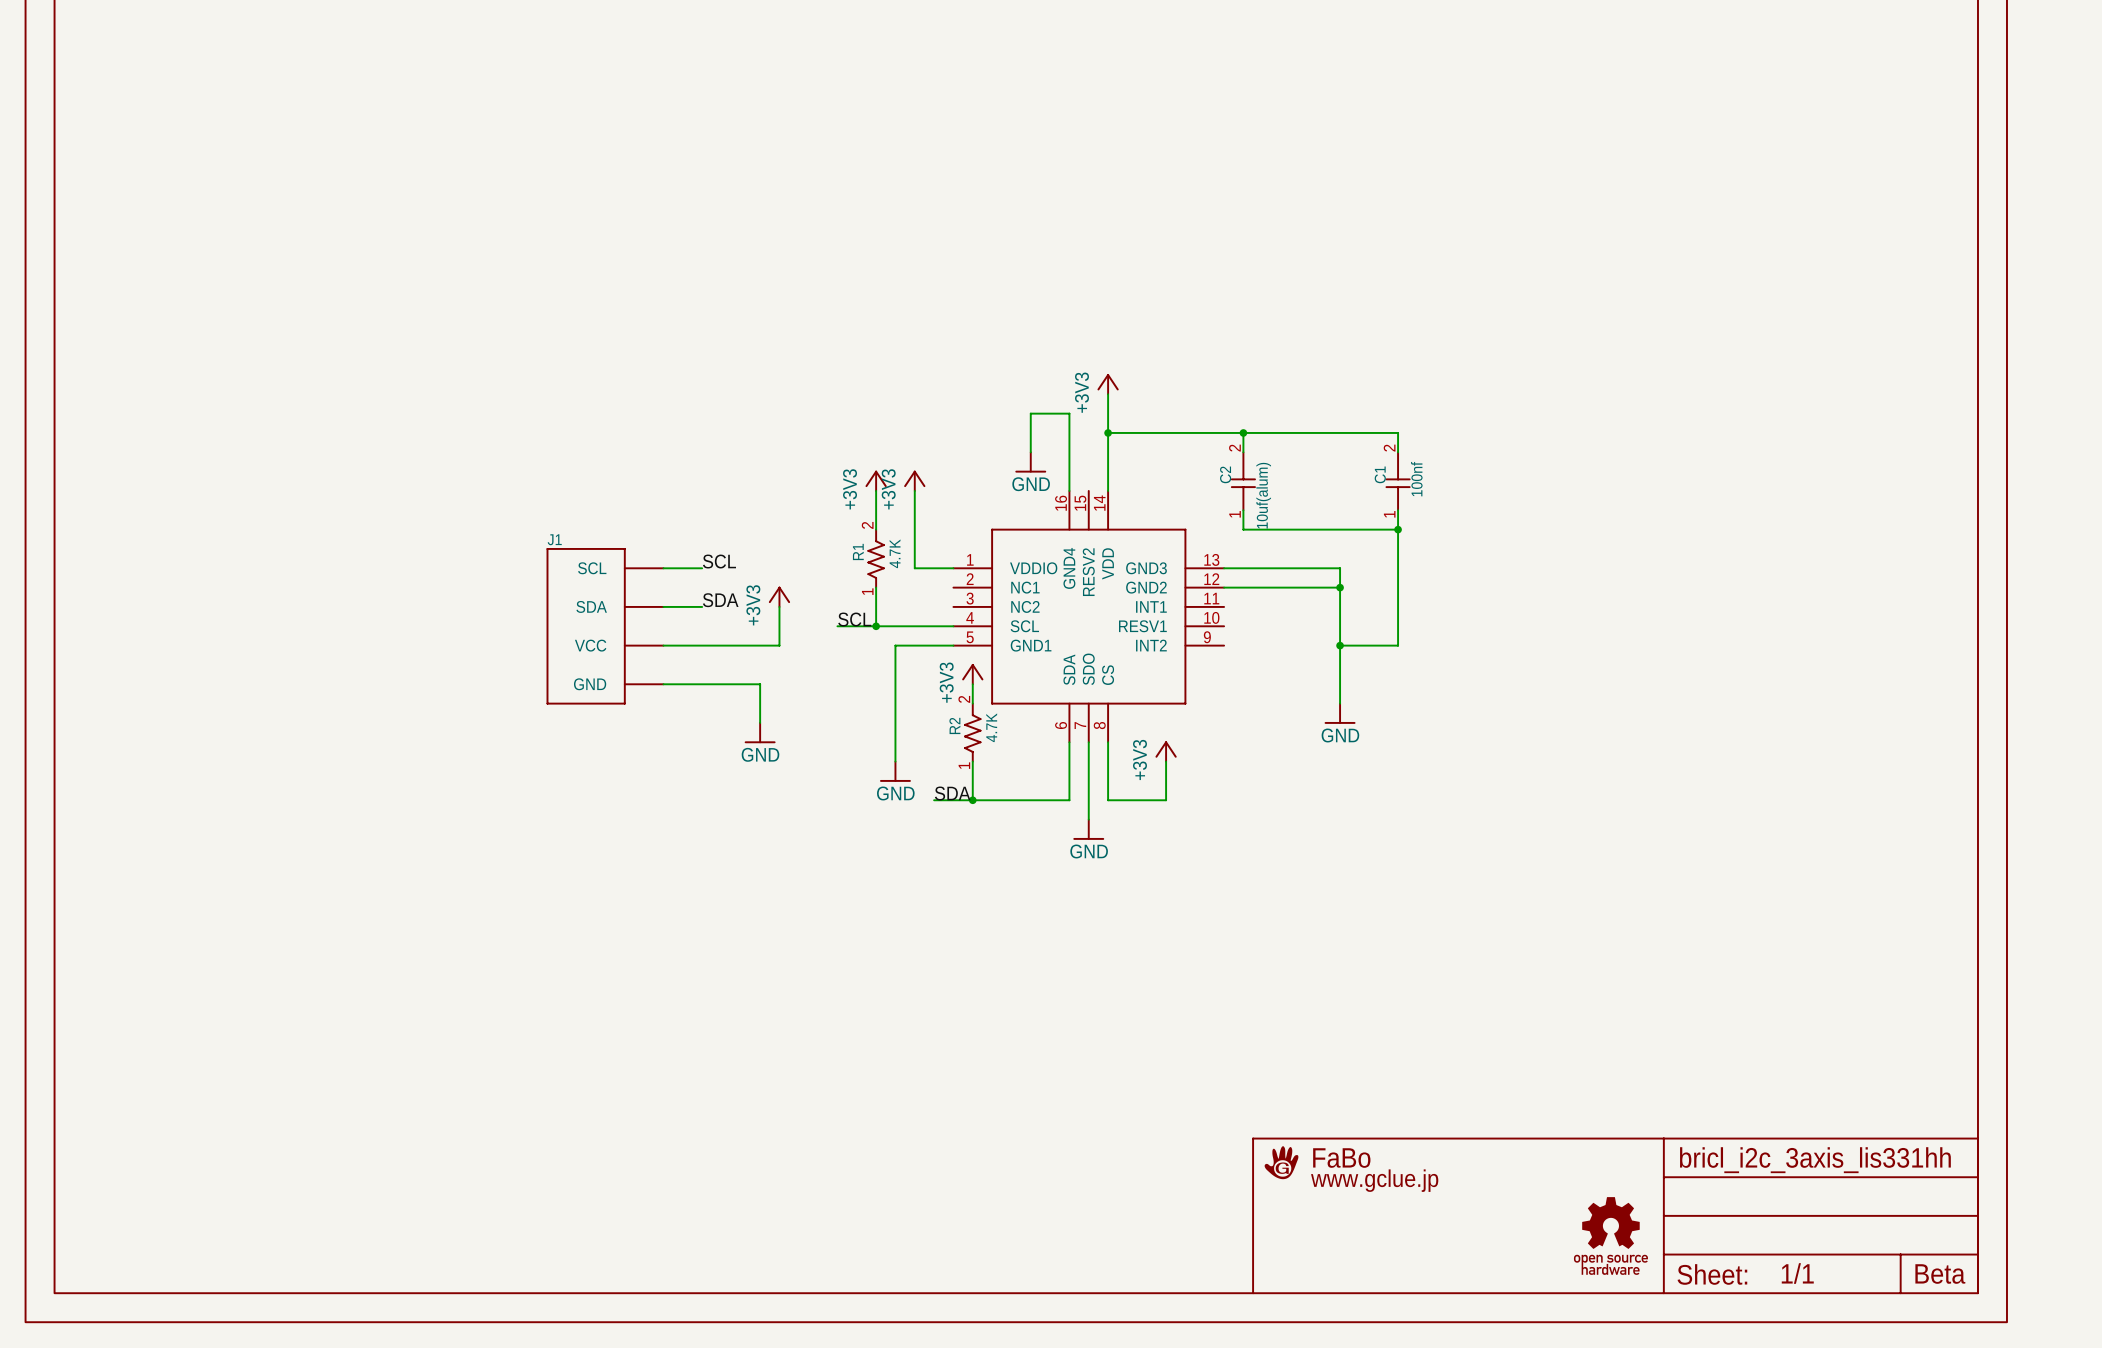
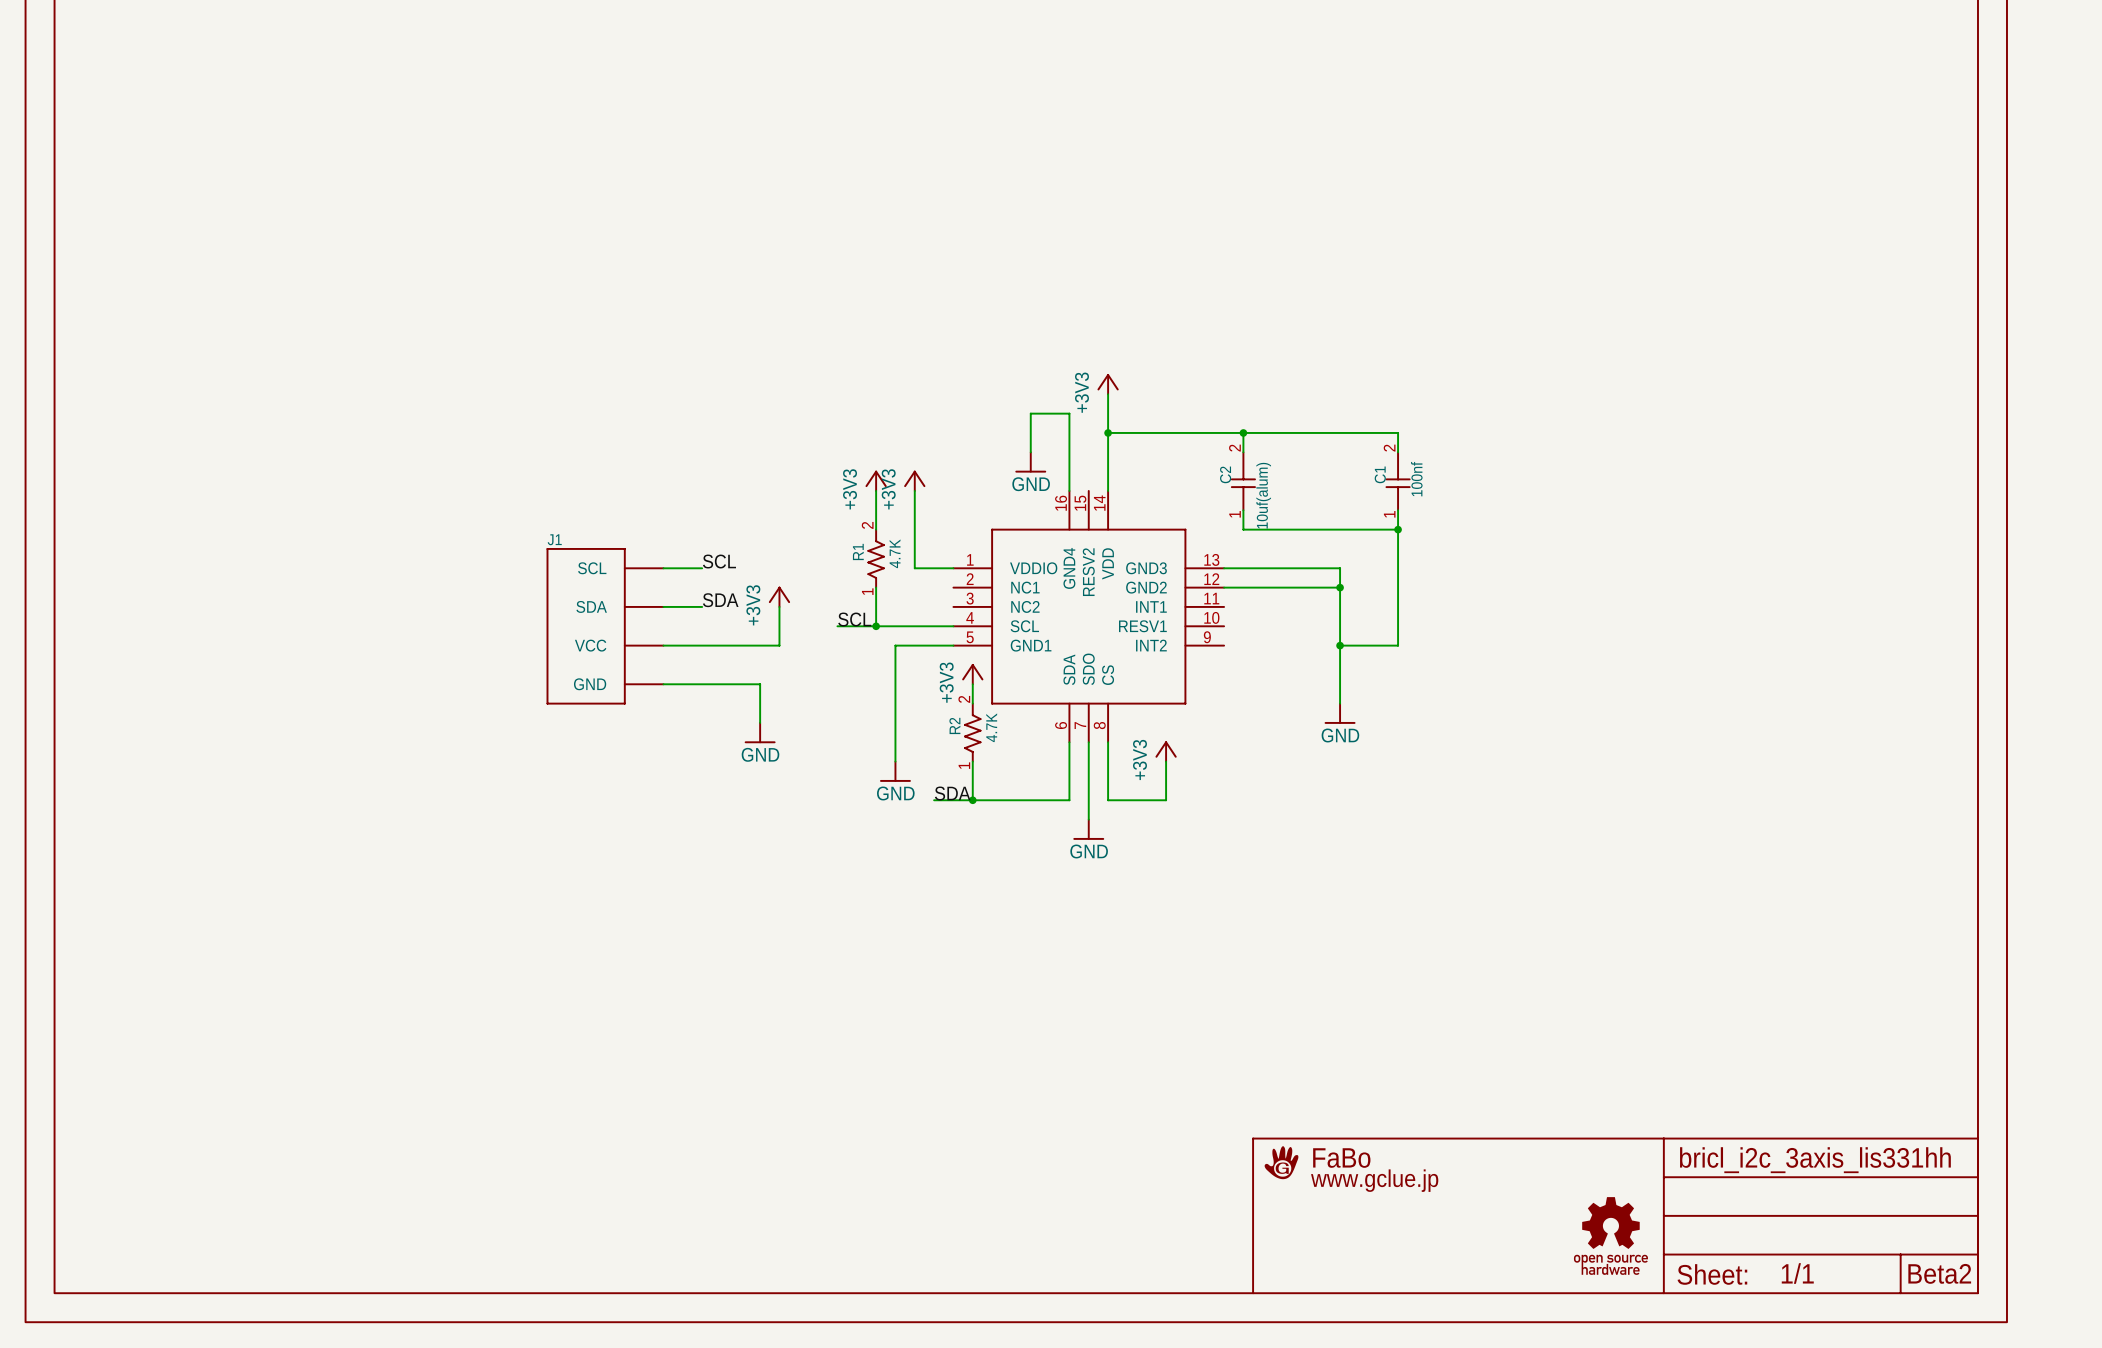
text: Beta (1940, 1274) -> Beta2 (1939, 1273)

